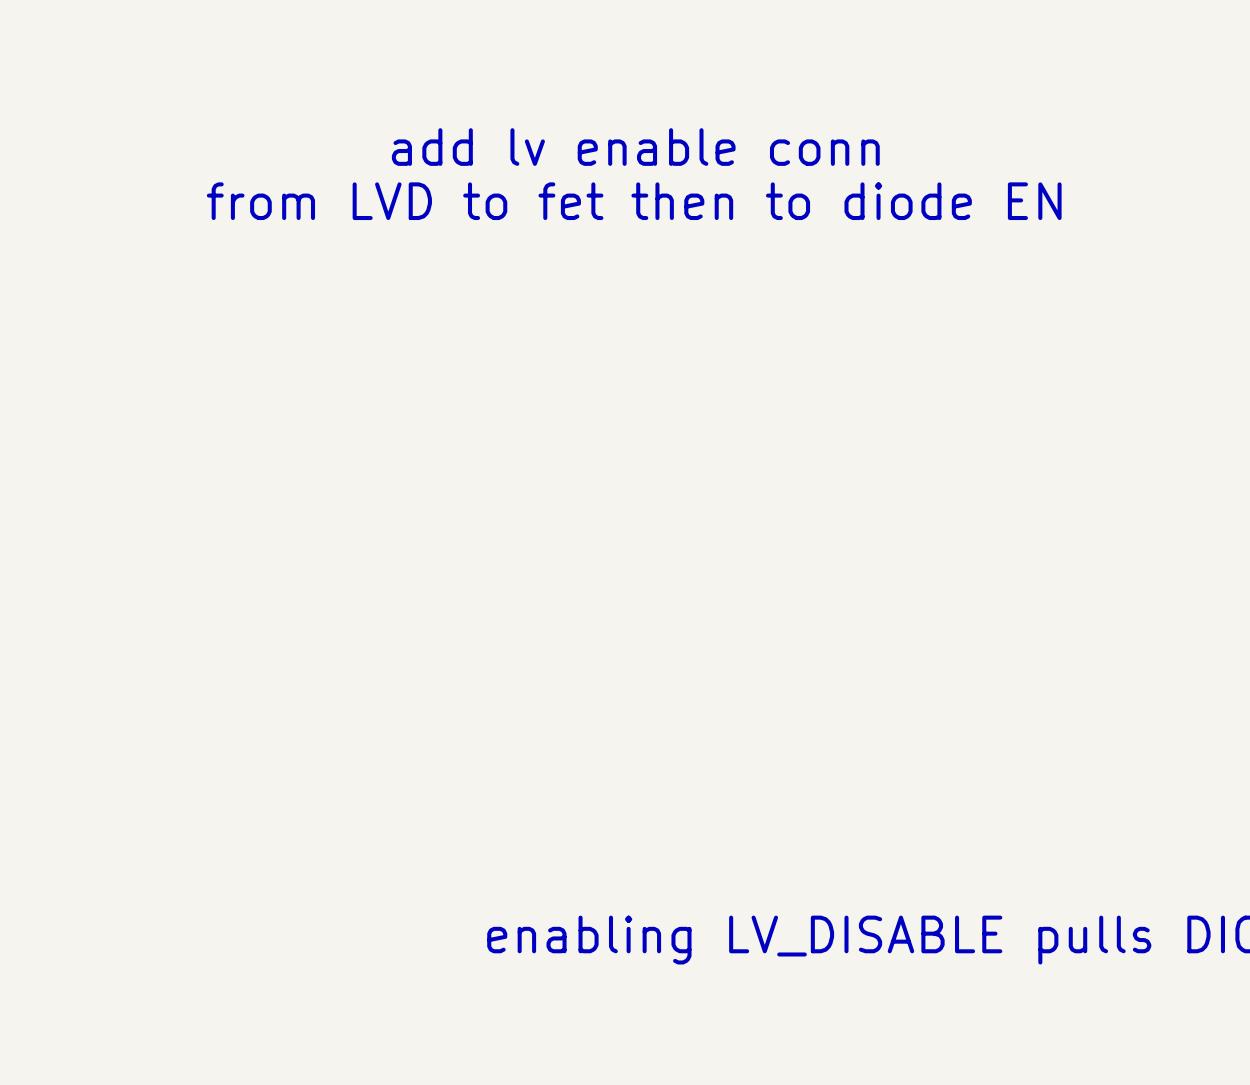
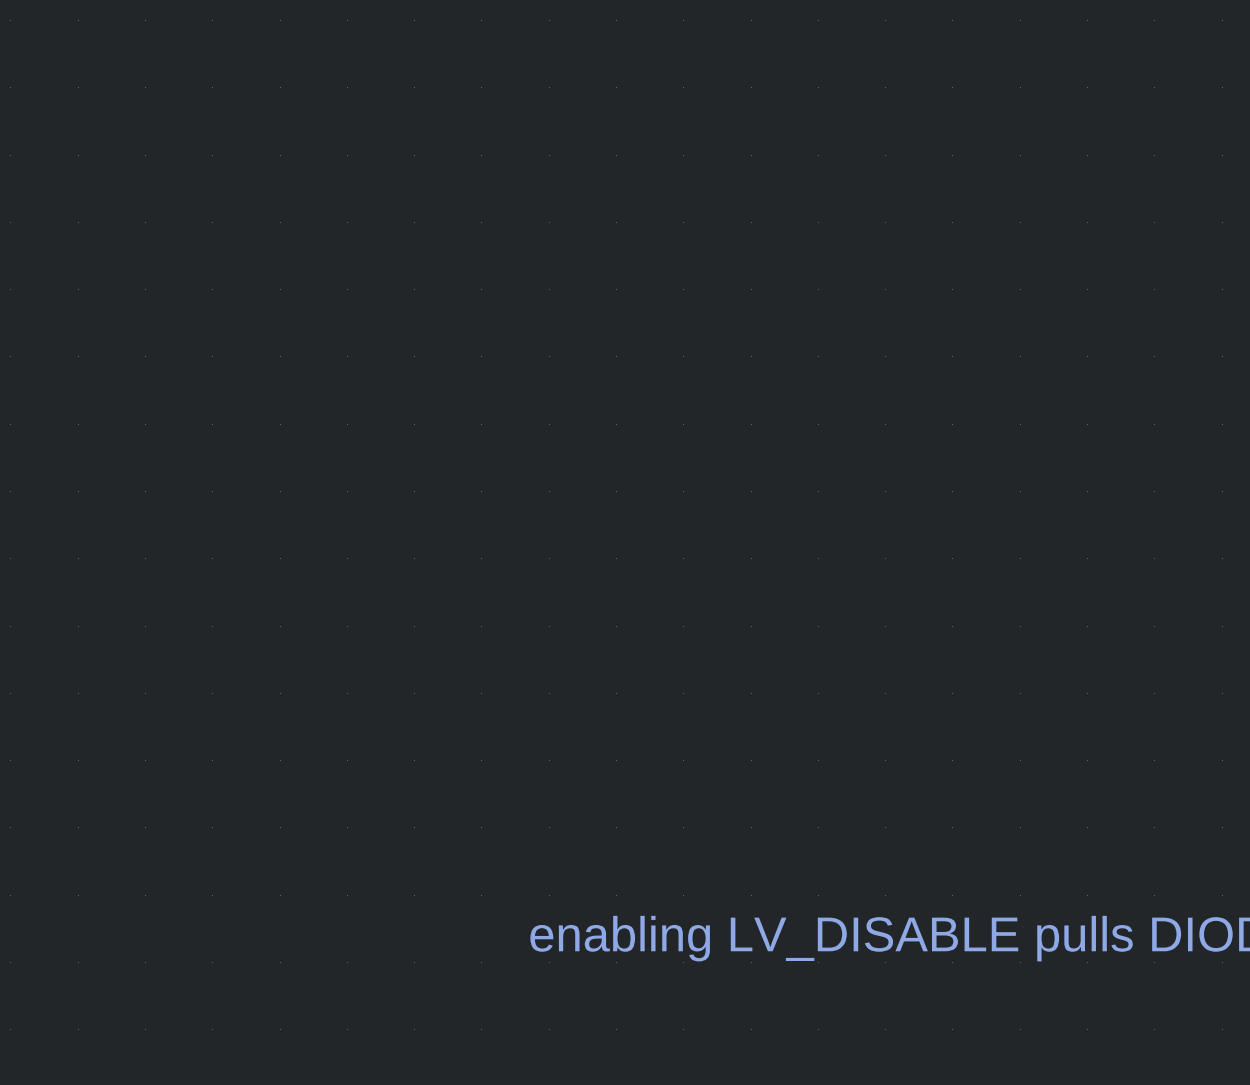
text: add lv enable conn (635, 147) -> none
text: from LVD to fet then to diode EN (634, 201) -> none

